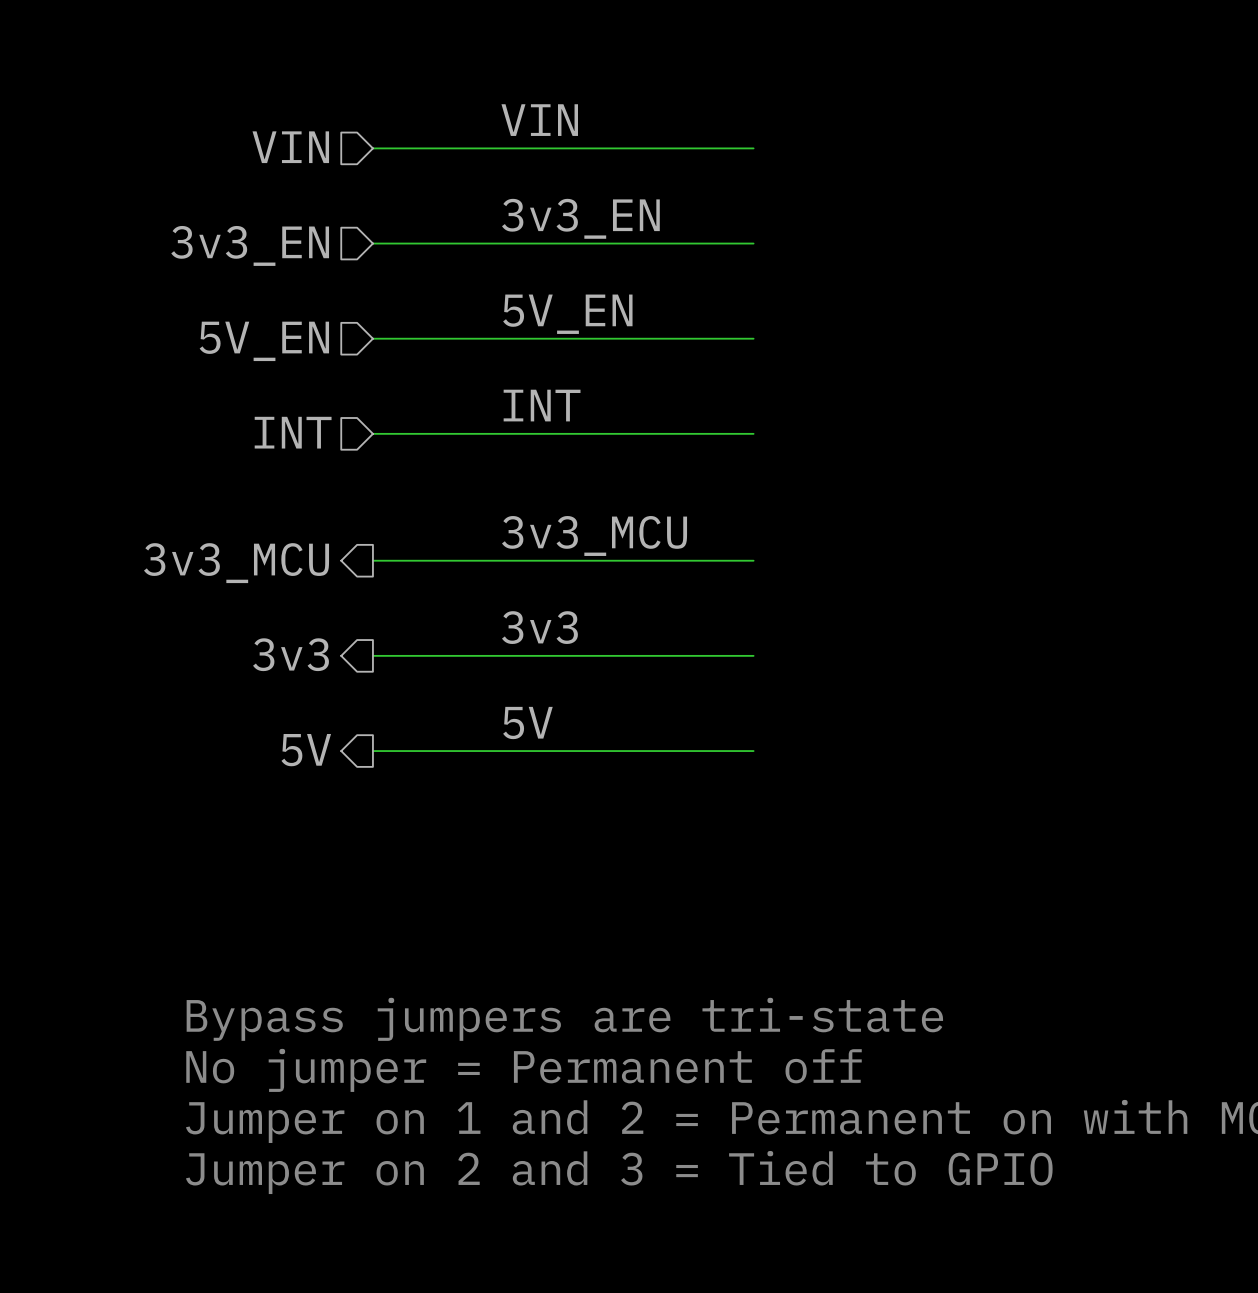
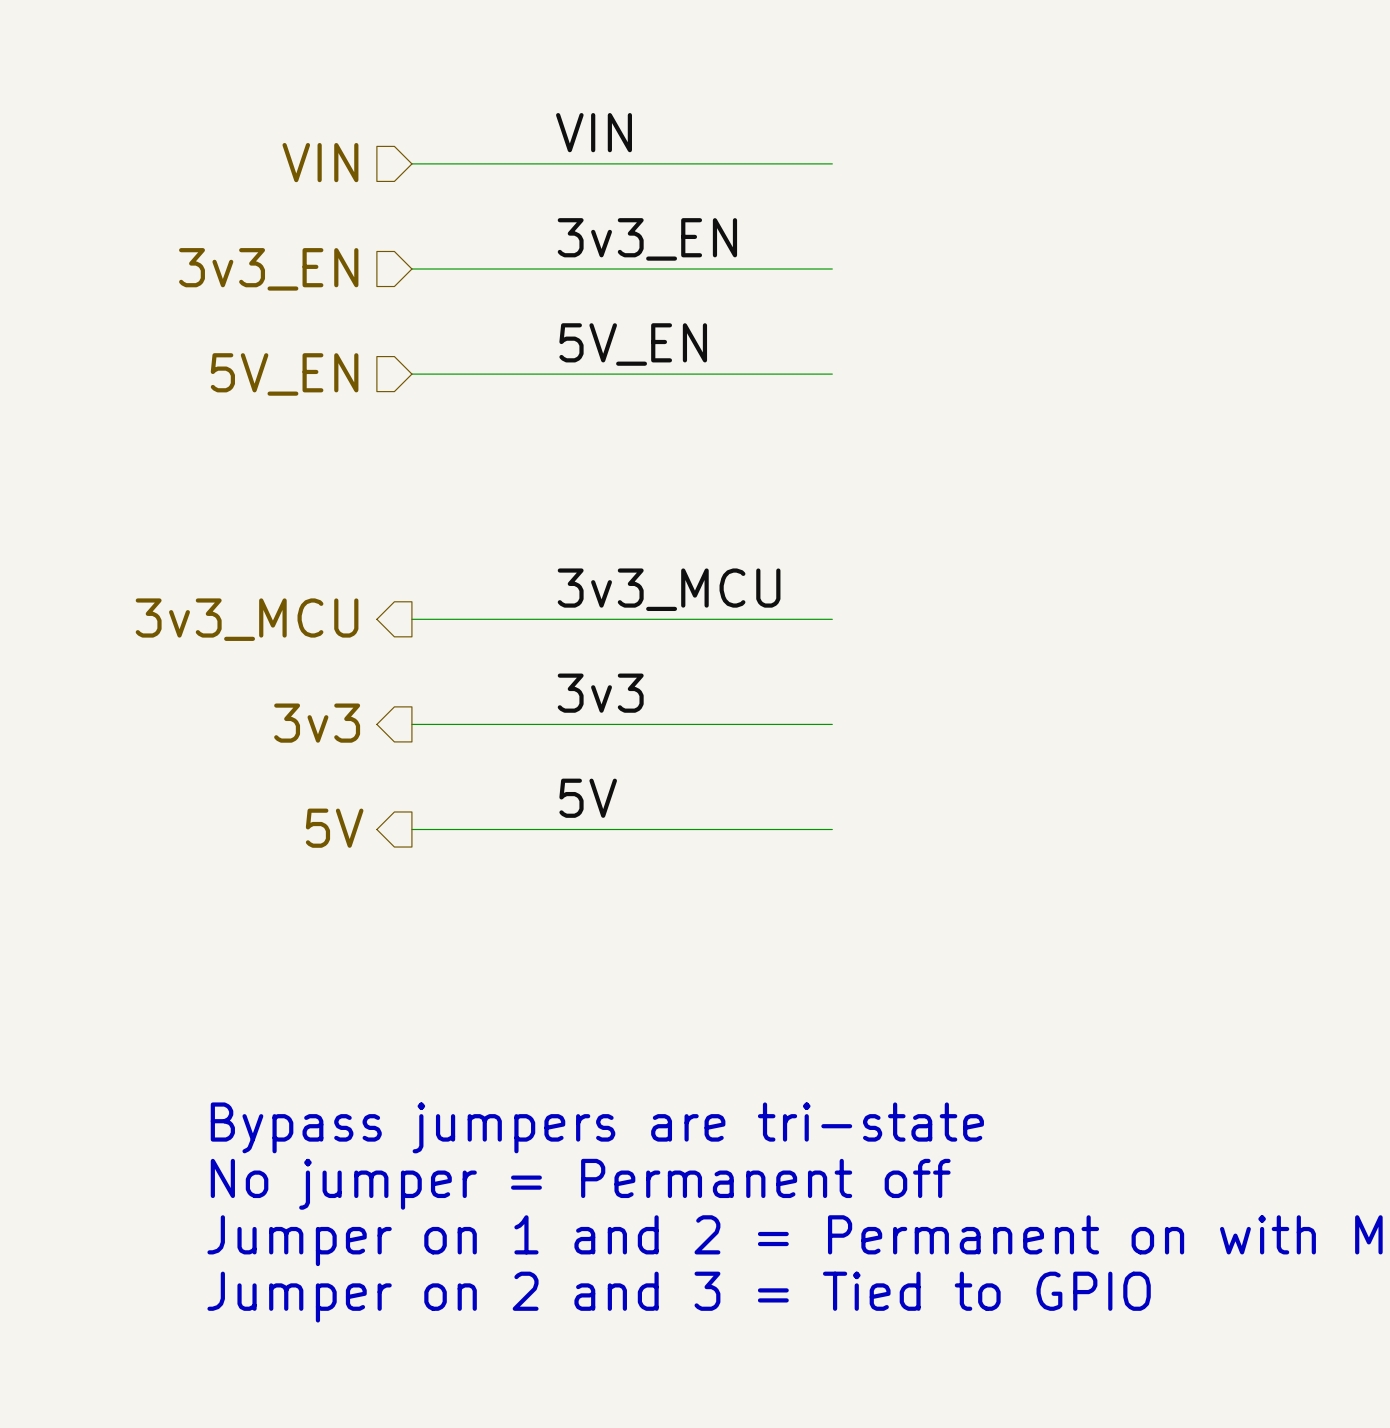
label: INT (542, 405) -> none
hierarchical label: INT (293, 432) -> none
wire: (372, 433) (753, 433) -> none

